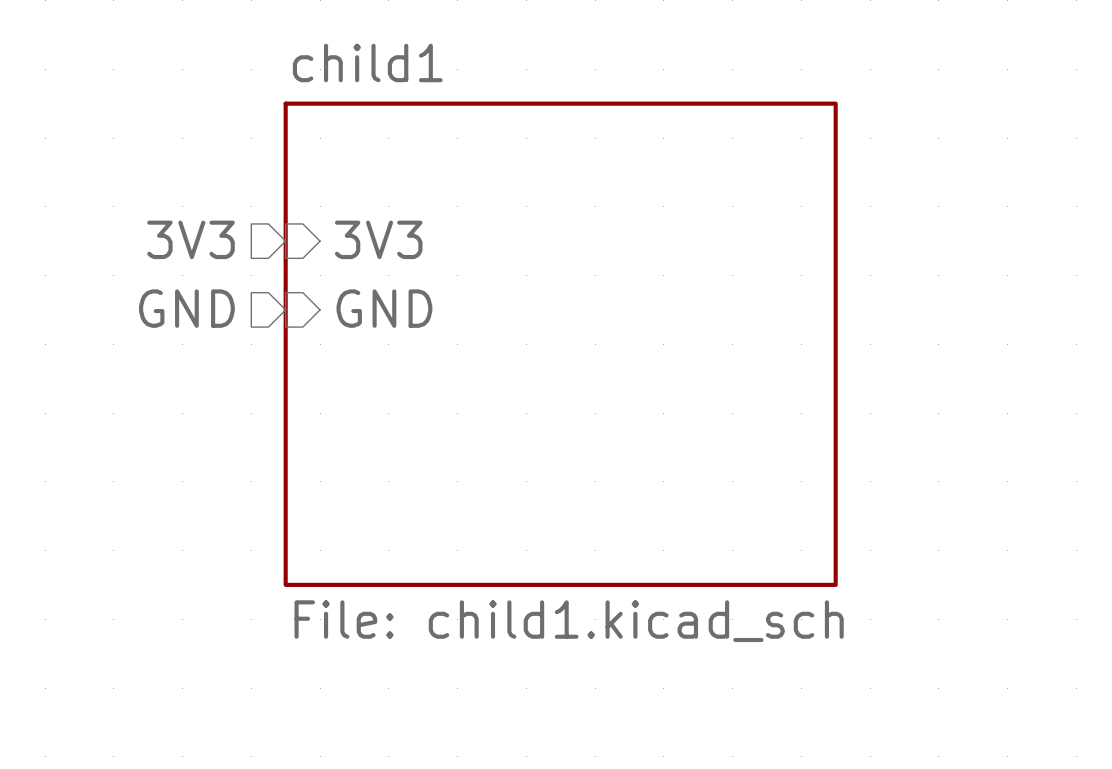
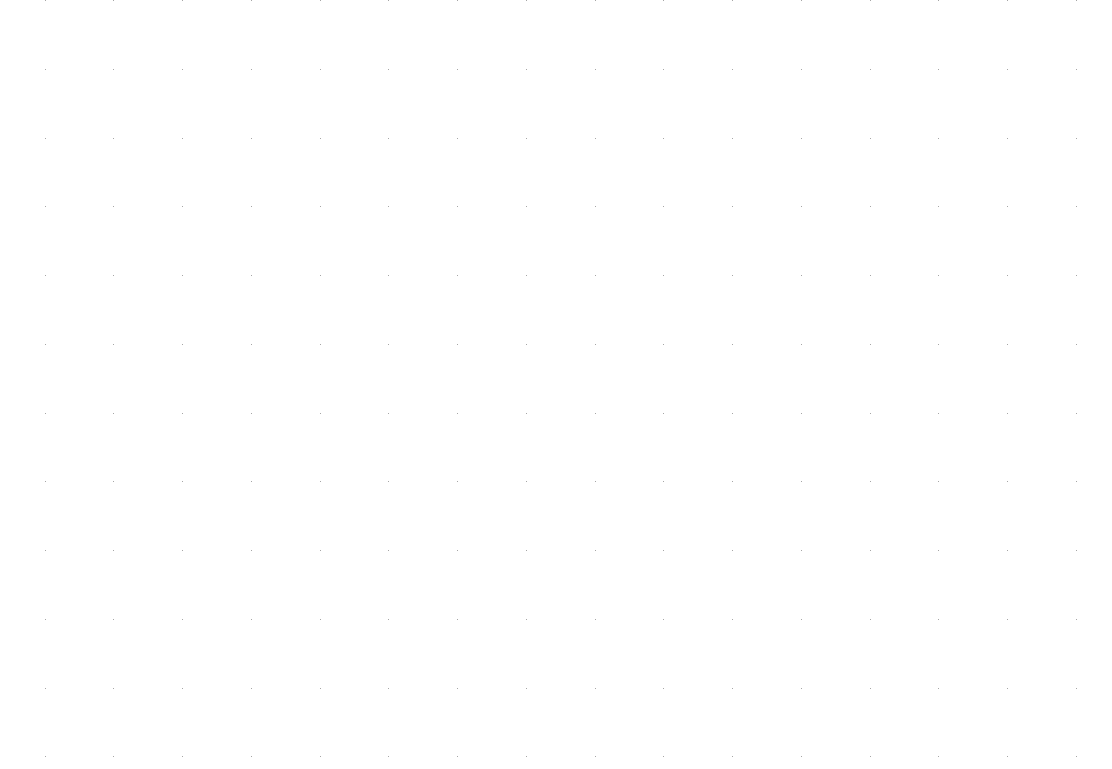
hierarchical label: 3V3 (191, 239) -> none
sheet pin: 3V3 (378, 239) -> none
hierarchical label: GND (186, 308) -> none
sheet pin: GND (384, 308) -> none
sheet child1: File: child1.kicad_sch (560, 344) -> none

